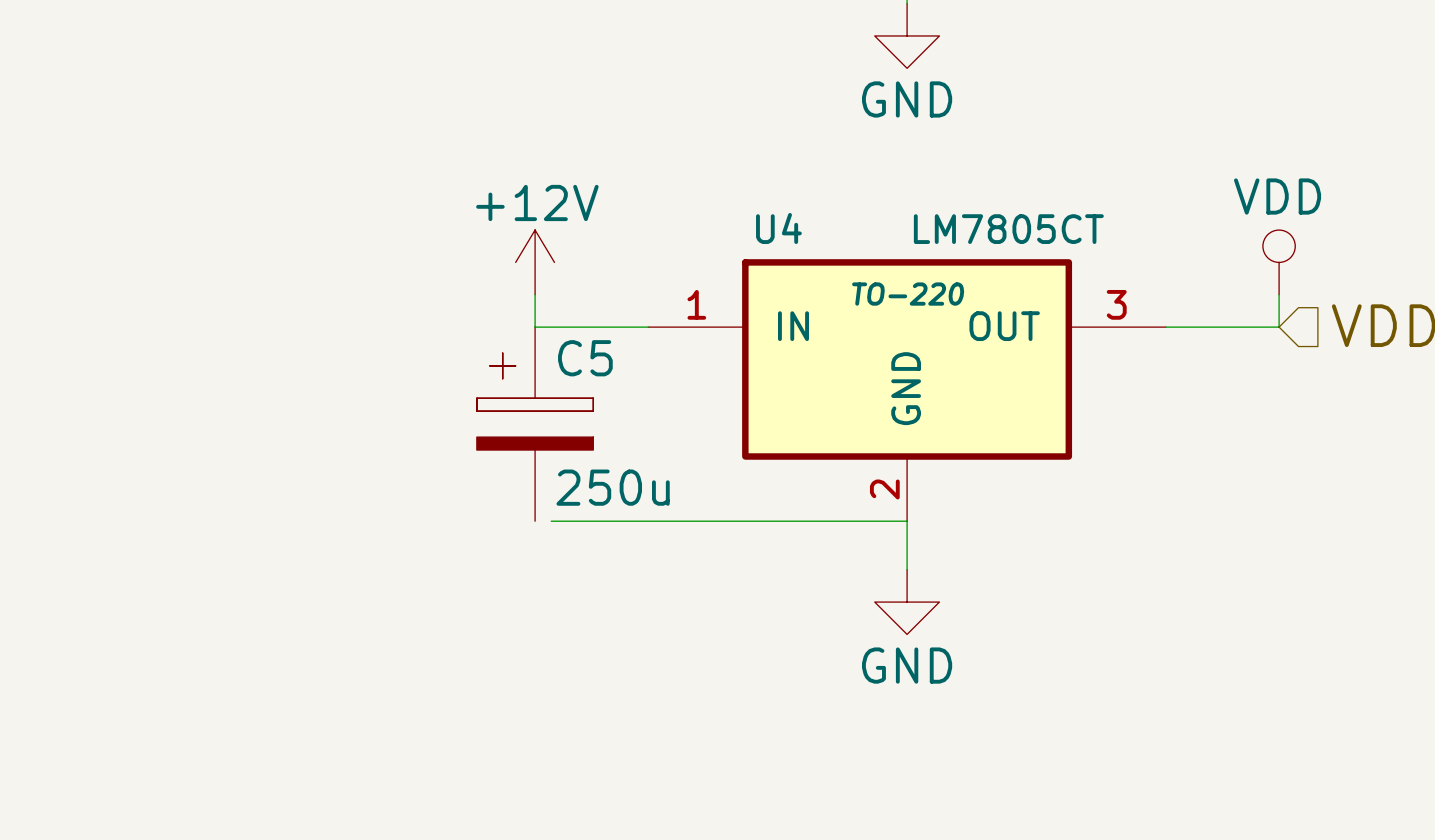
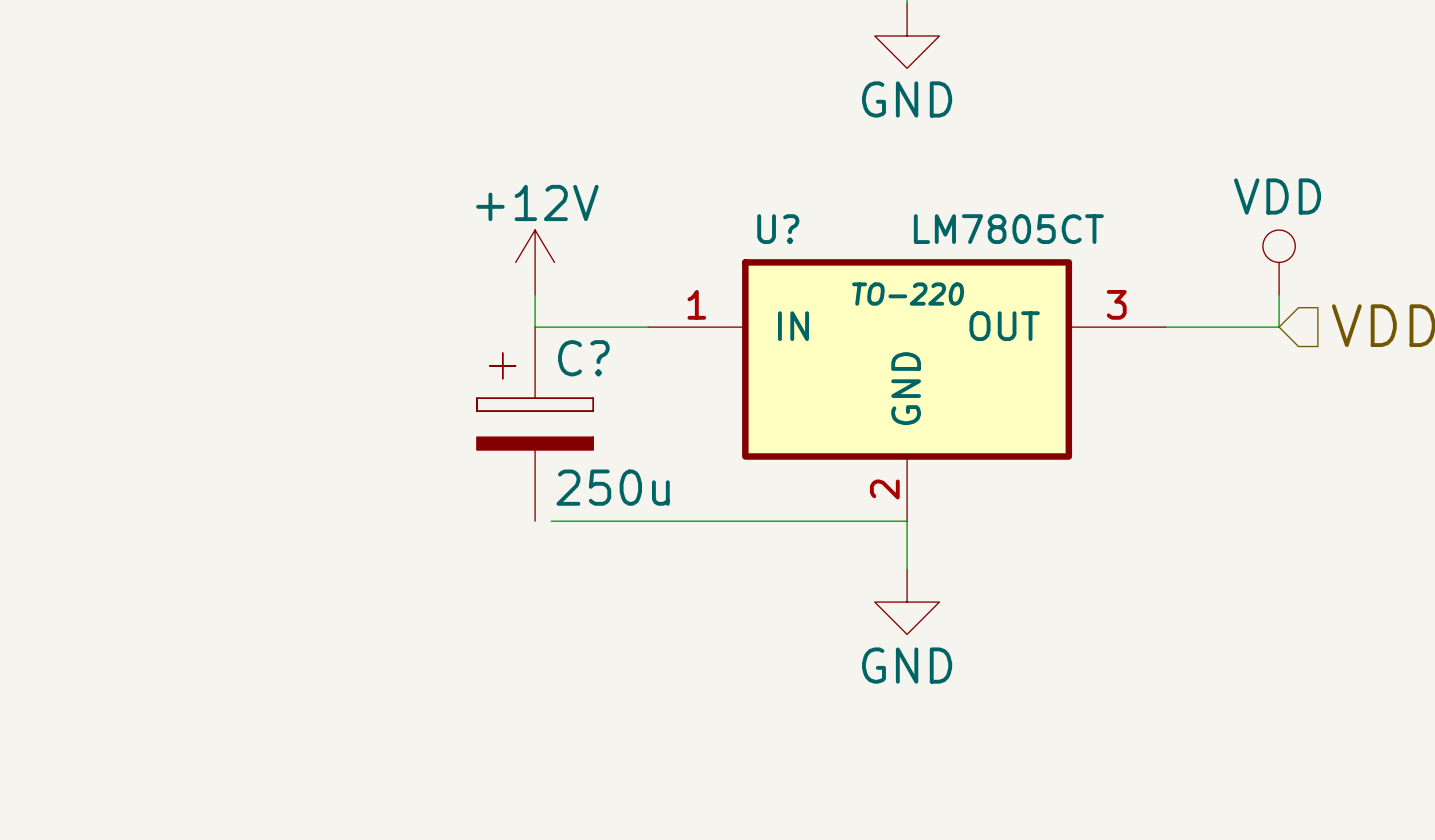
U4 name: U4 (778, 228) -> U? (778, 229)
C5 name: C5 (585, 358) -> C? (583, 358)

